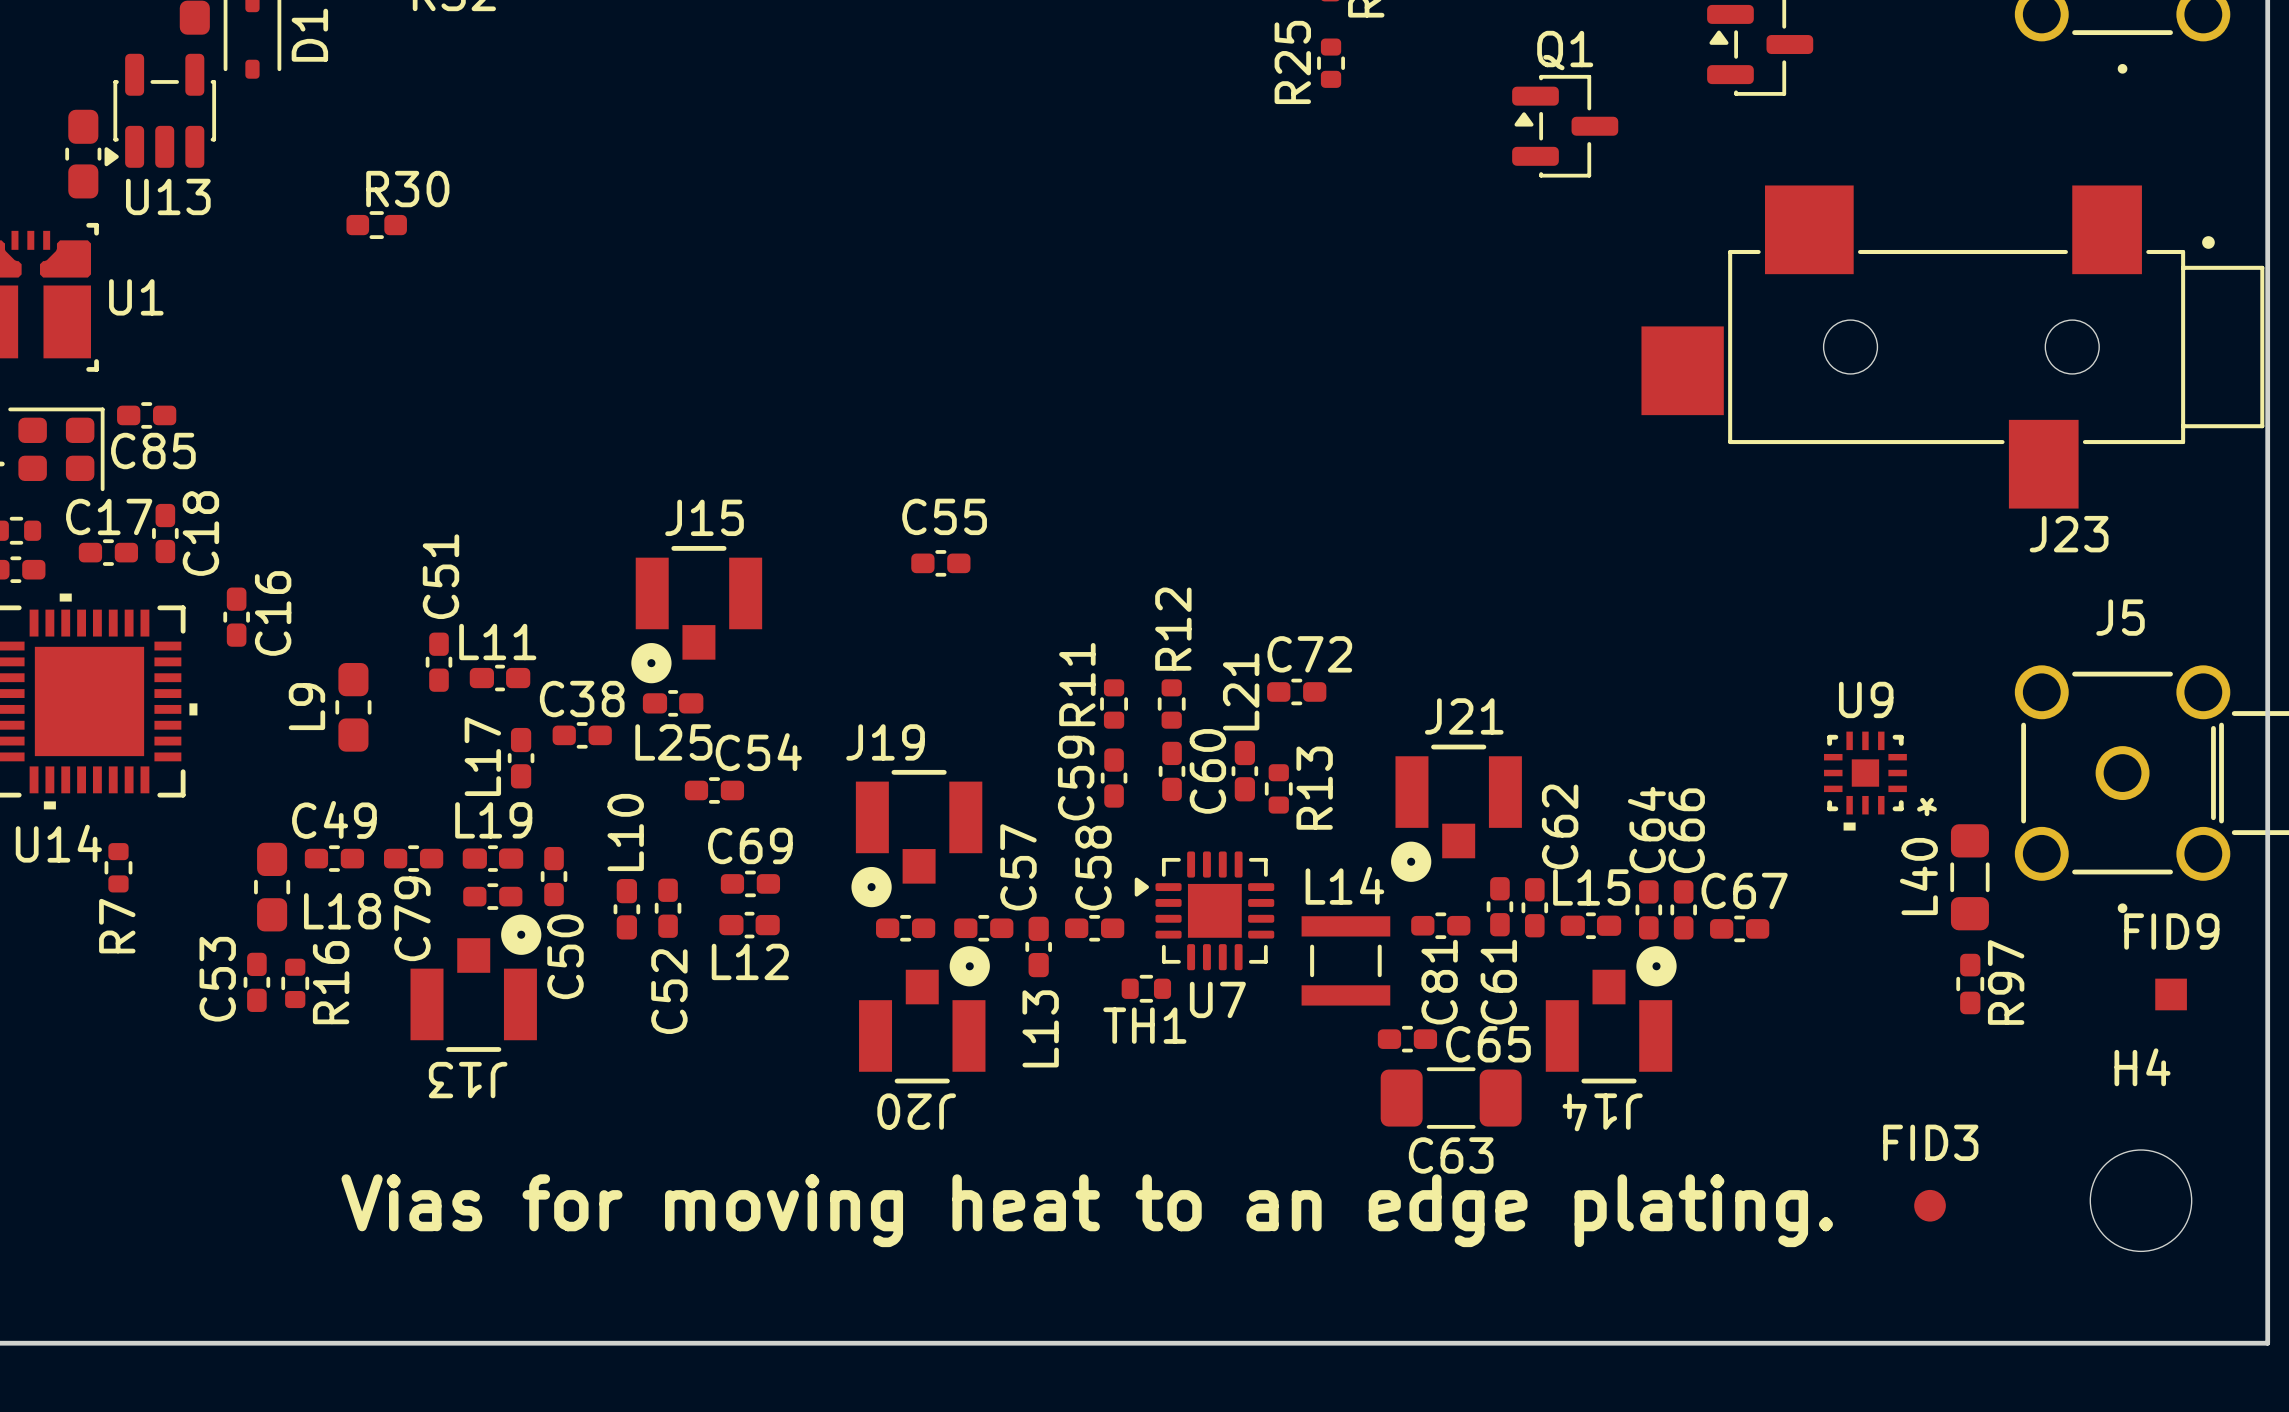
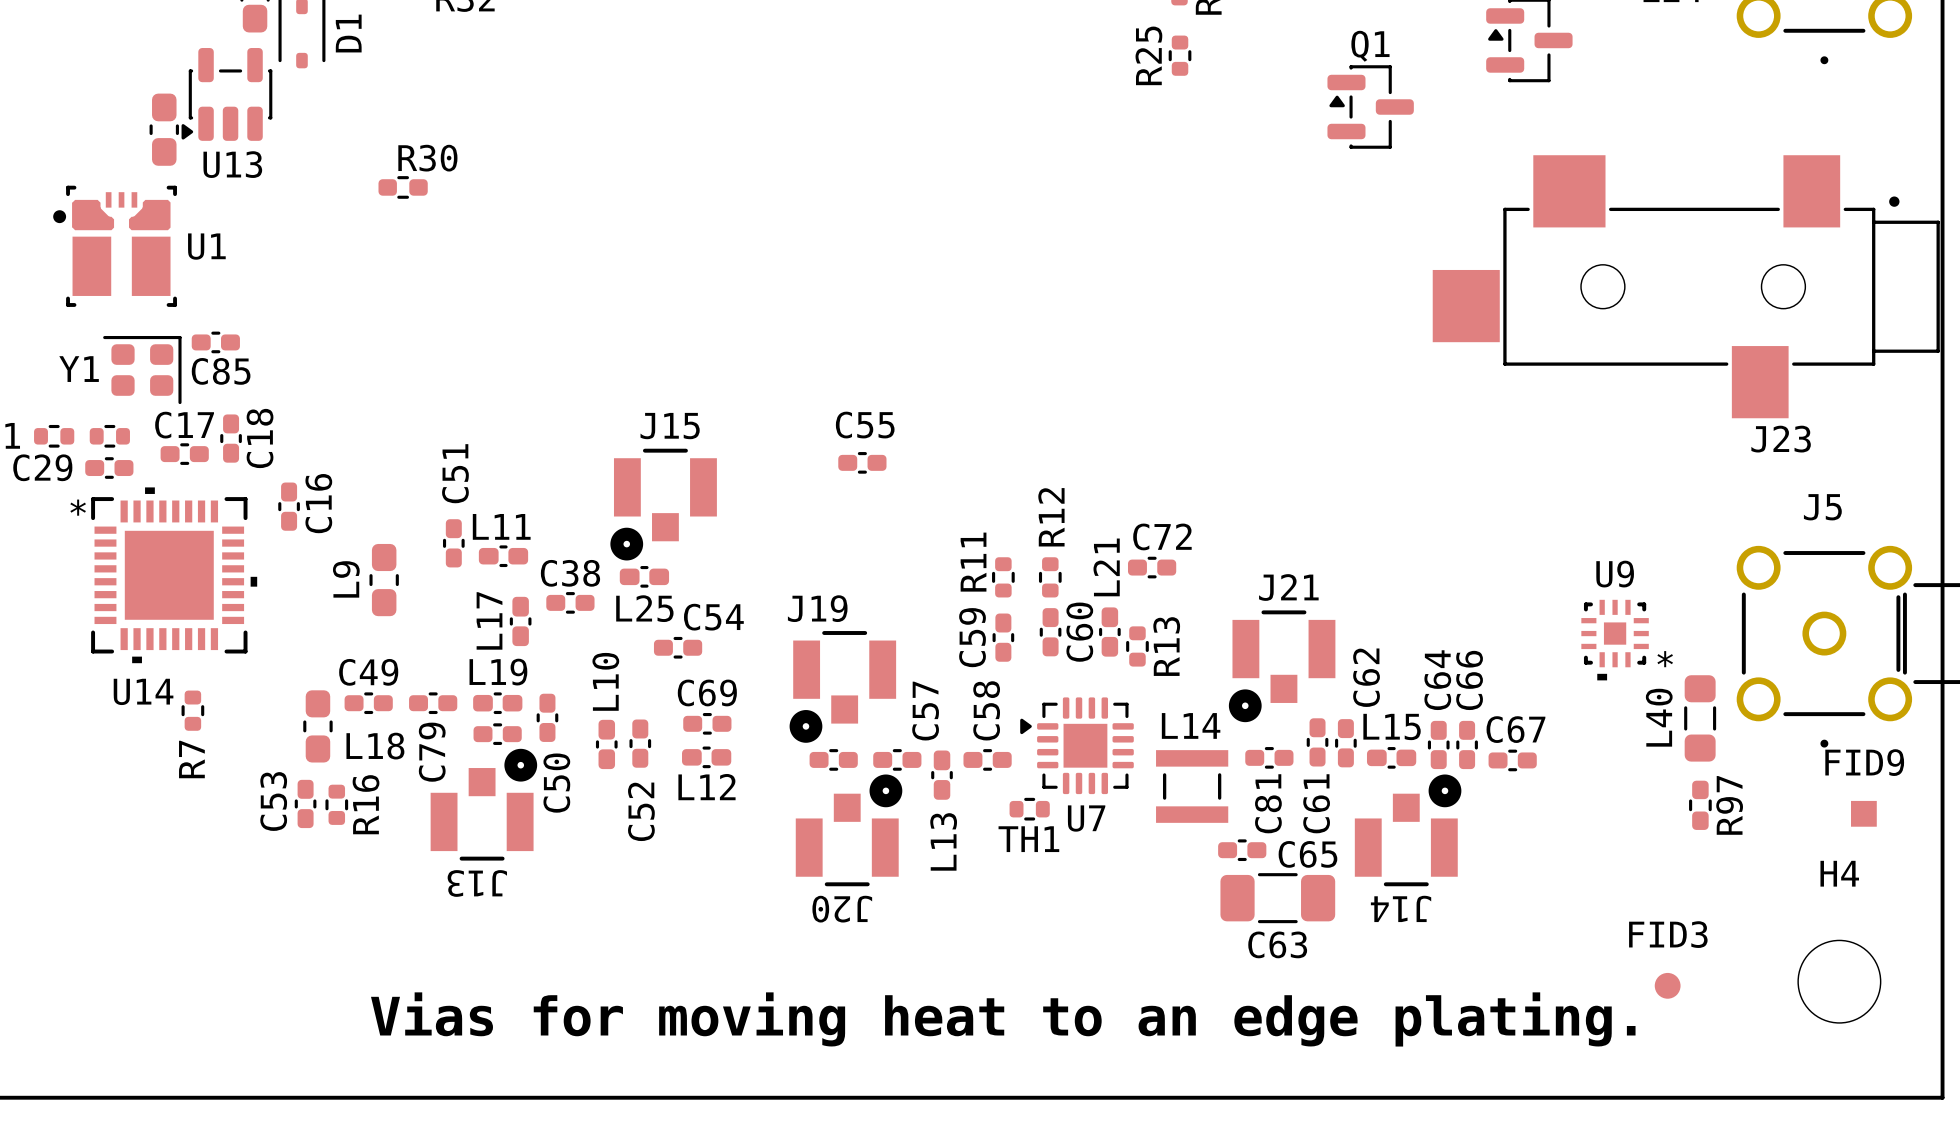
text position: Vias for moving heat to an edge plating. (1087, 1210) -> Vias for moving heat to an edge plating. (1003, 1019)

